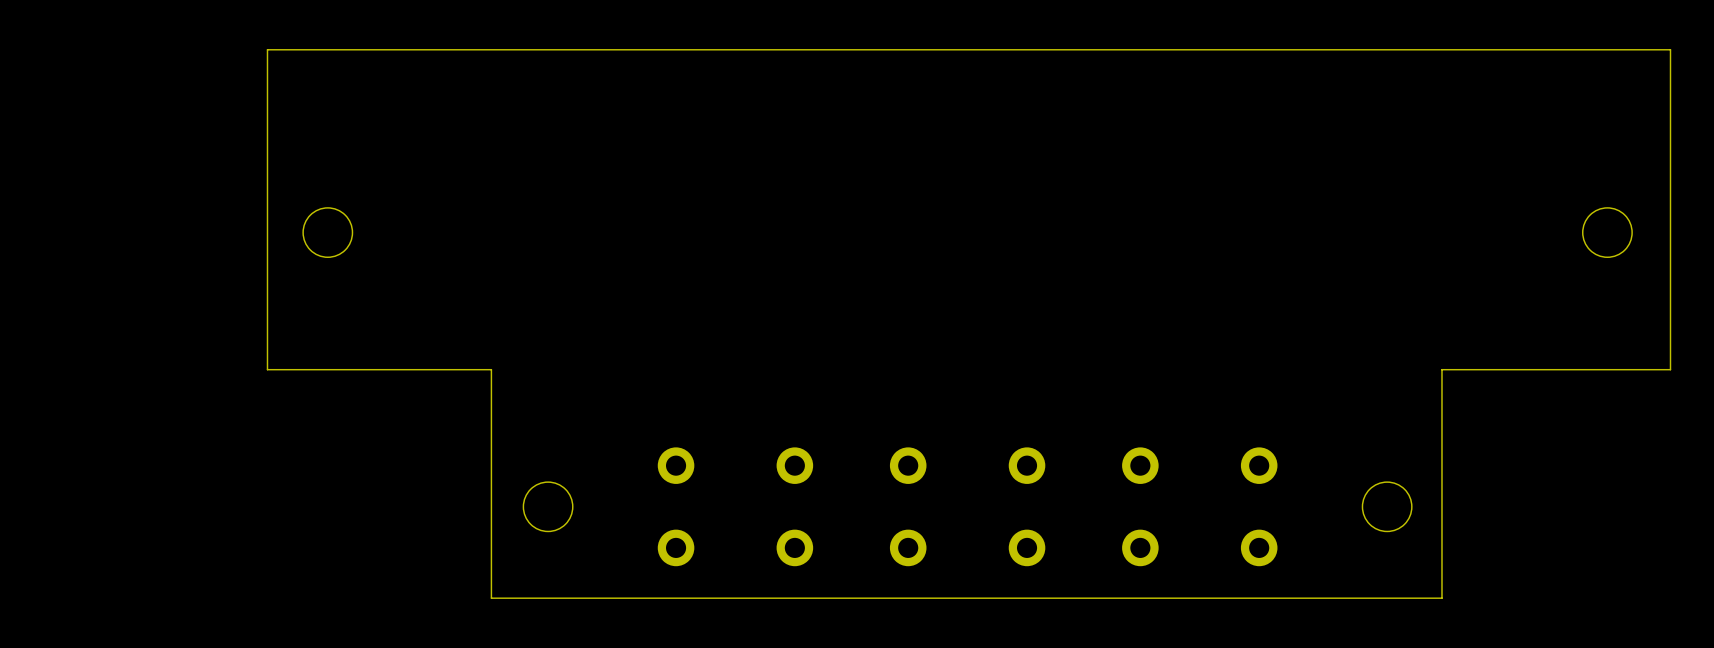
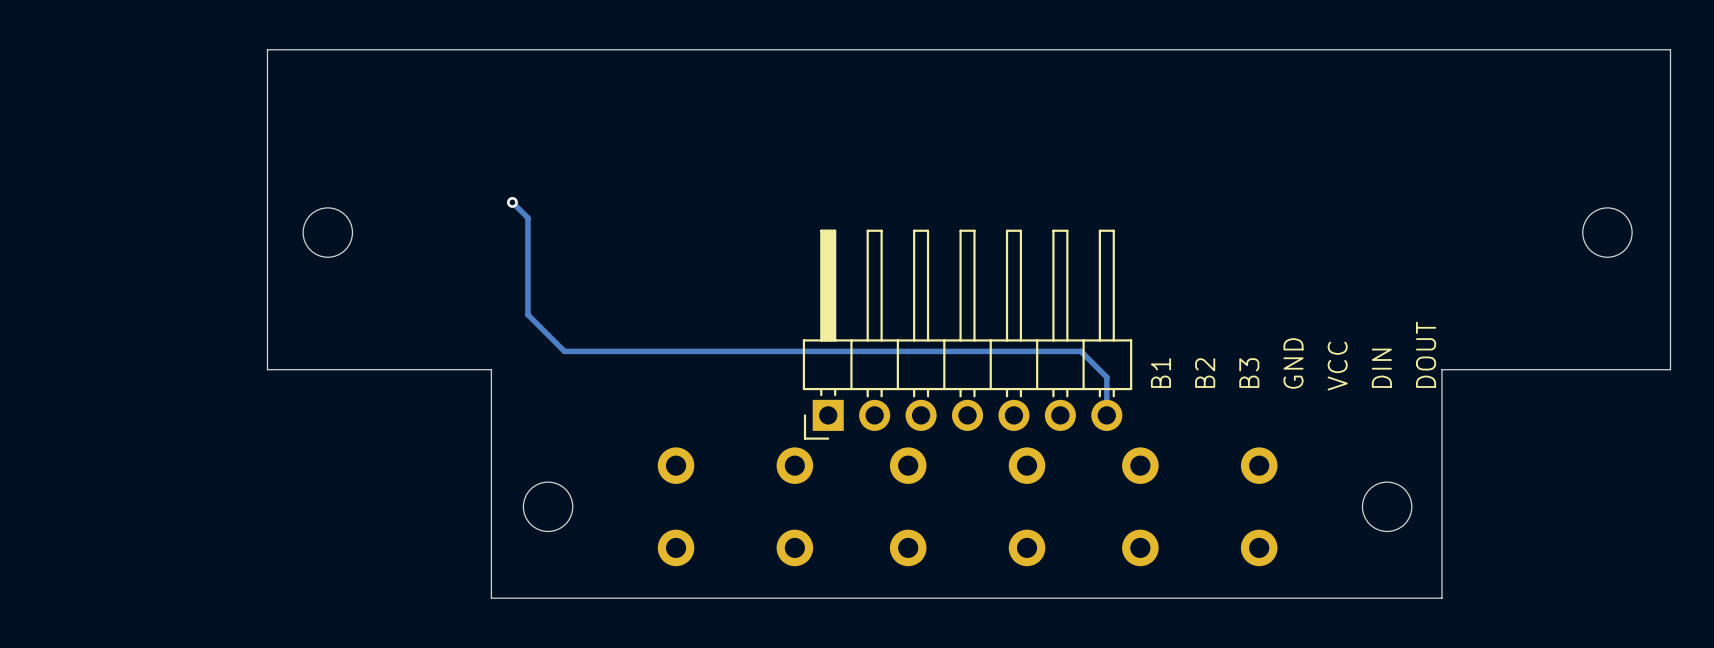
track: none -> (512, 202) (527, 217) (527, 314) (564, 351) (1080, 351) (1106, 377) (1106, 415)
via: none -> (512, 202)
part: none -> (967, 334)
text: none -> DOUT (1426, 354)
text: none -> GND (1293, 363)
text: none -> VCC (1337, 366)
text: none -> DIN (1381, 368)
text: none -> B1 (1160, 373)
text: none -> B2 (1205, 373)
text: none -> B3 (1249, 373)

